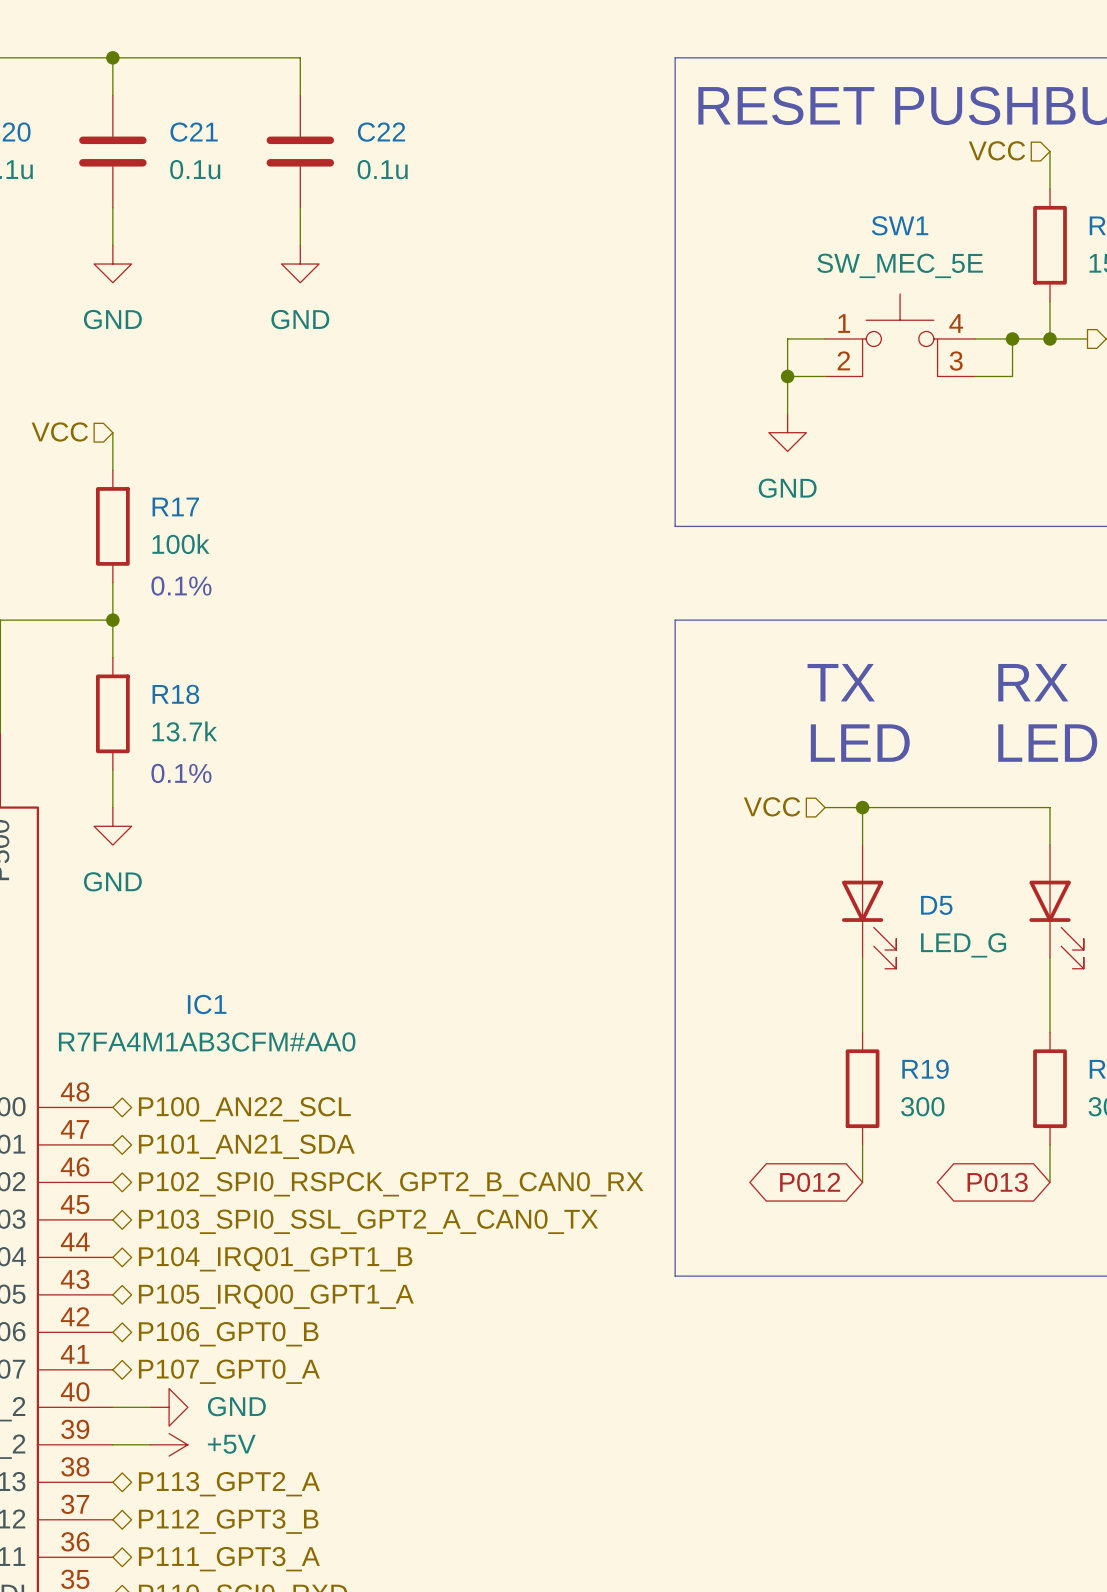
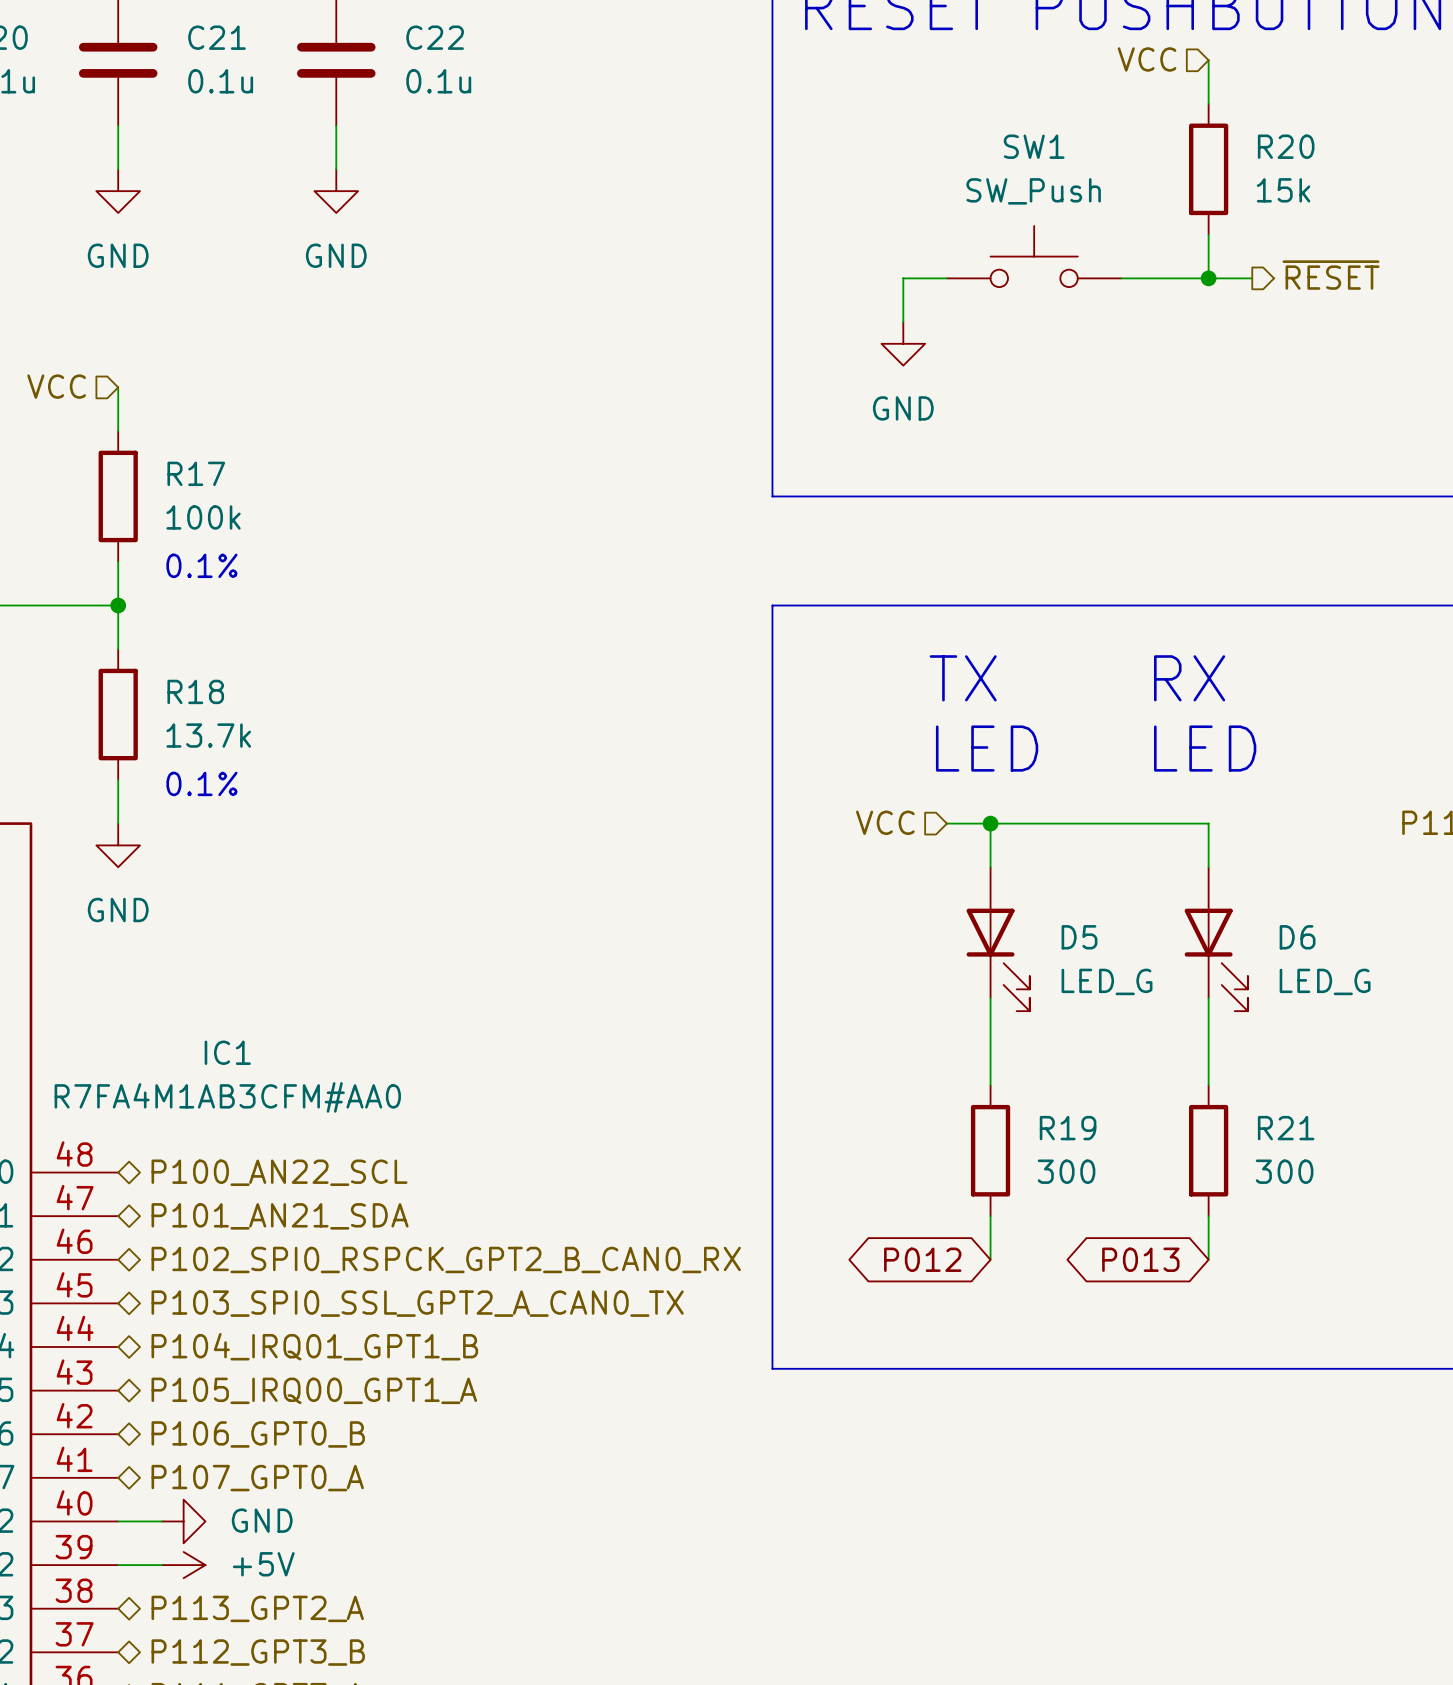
SW1 value: SW_MEC_5E (900, 265) -> SW_Push (1033, 191)
SW1 symbol: [825, 294, 976, 377] -> [946, 226, 1122, 288]
wire: (1012, 338) (1012, 376) (975, 376) -> none
junction: (1012, 338) -> none
junction: (787, 376) -> none
wire: (825, 376) (787, 376) (787, 413) -> none
power symbol position: GND (787, 432) -> GND (903, 343)

